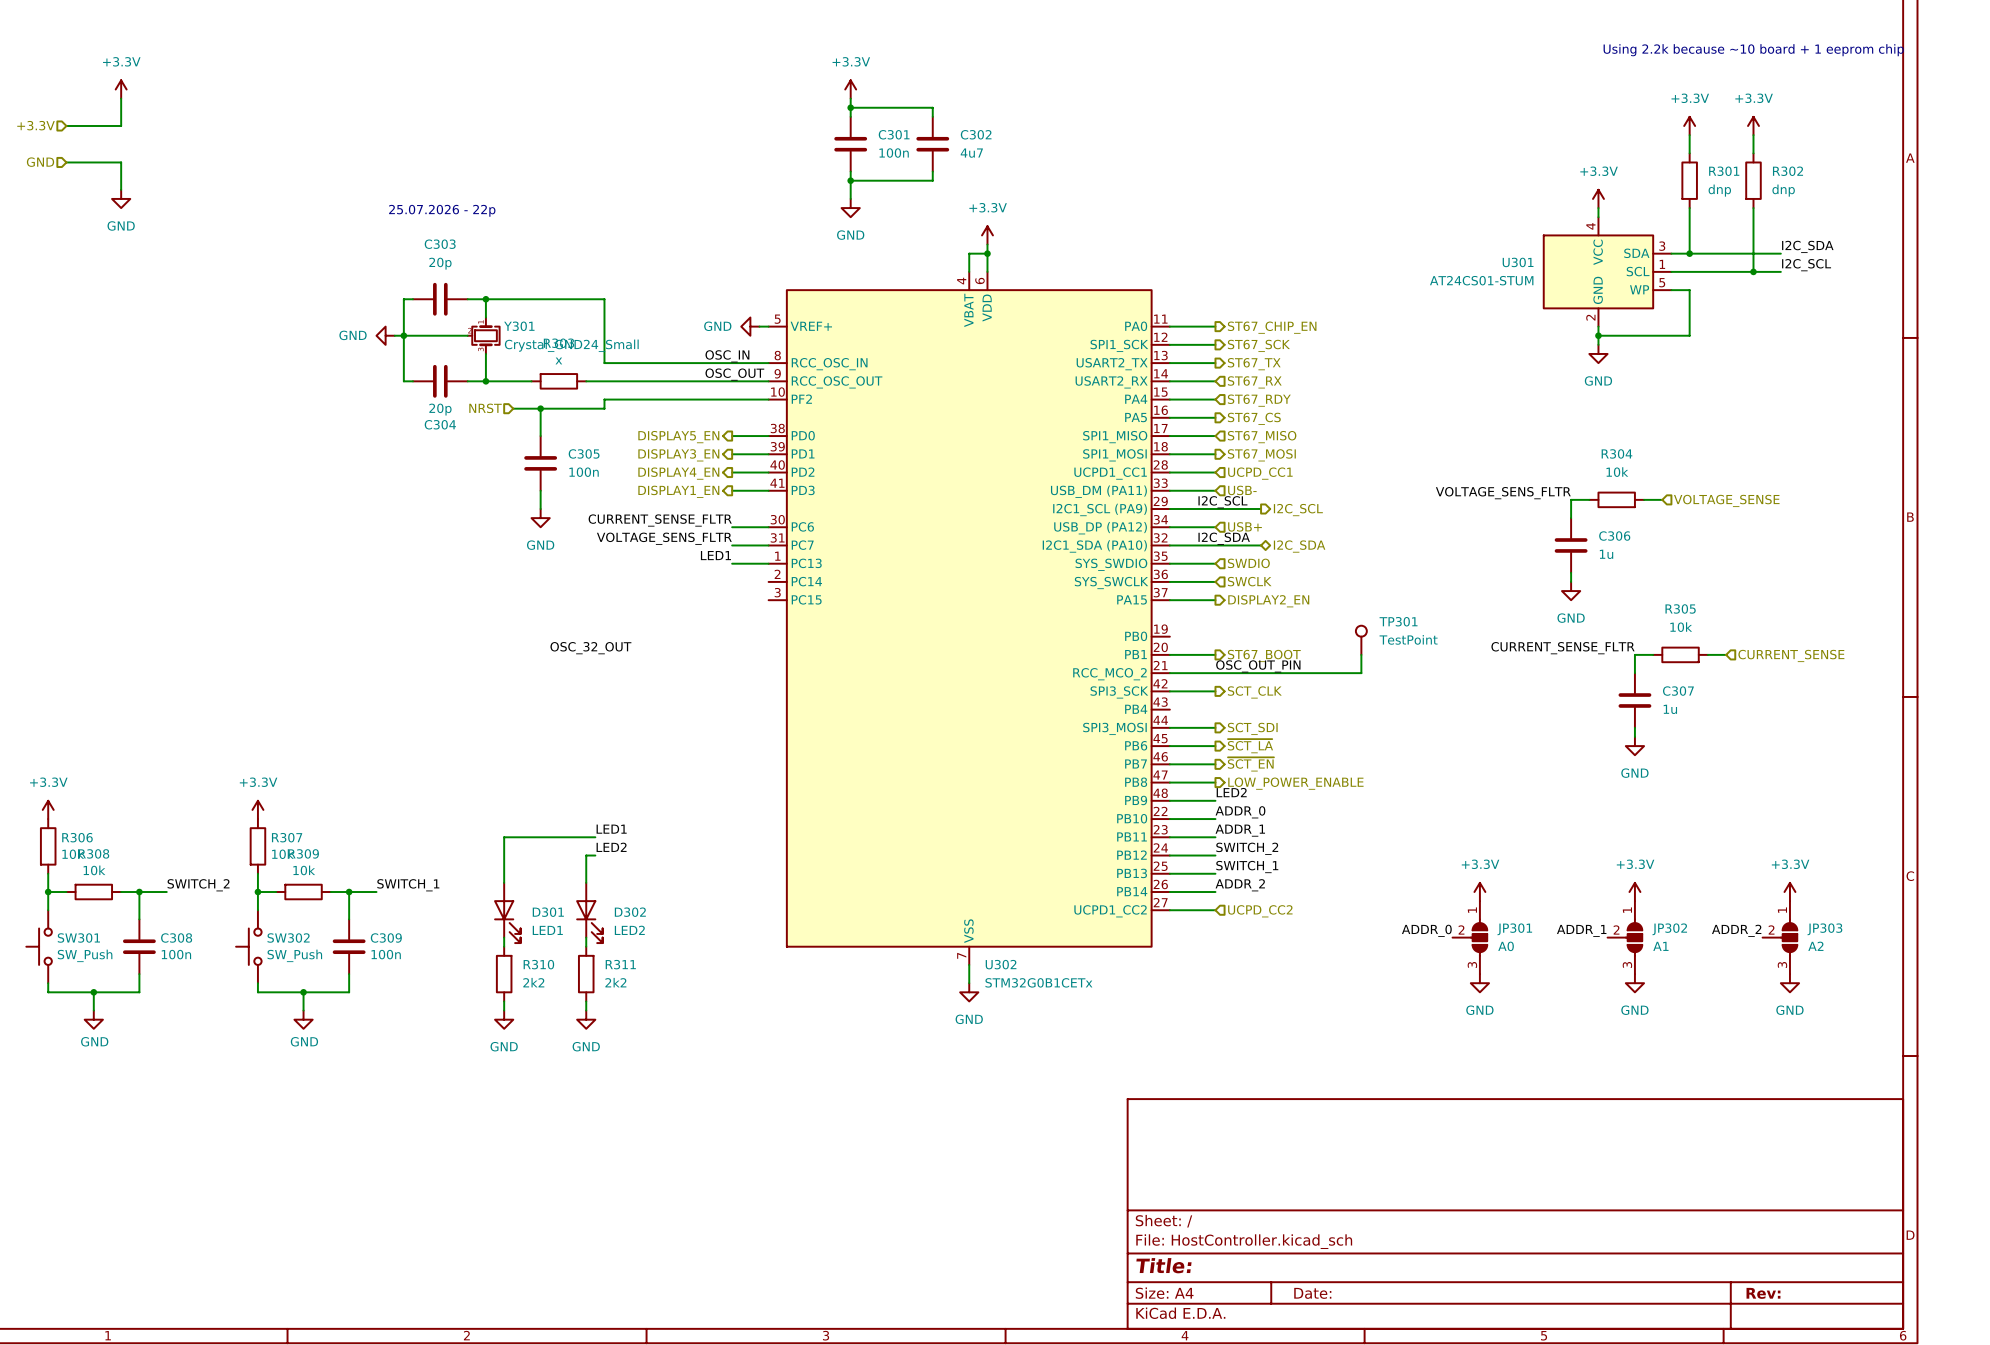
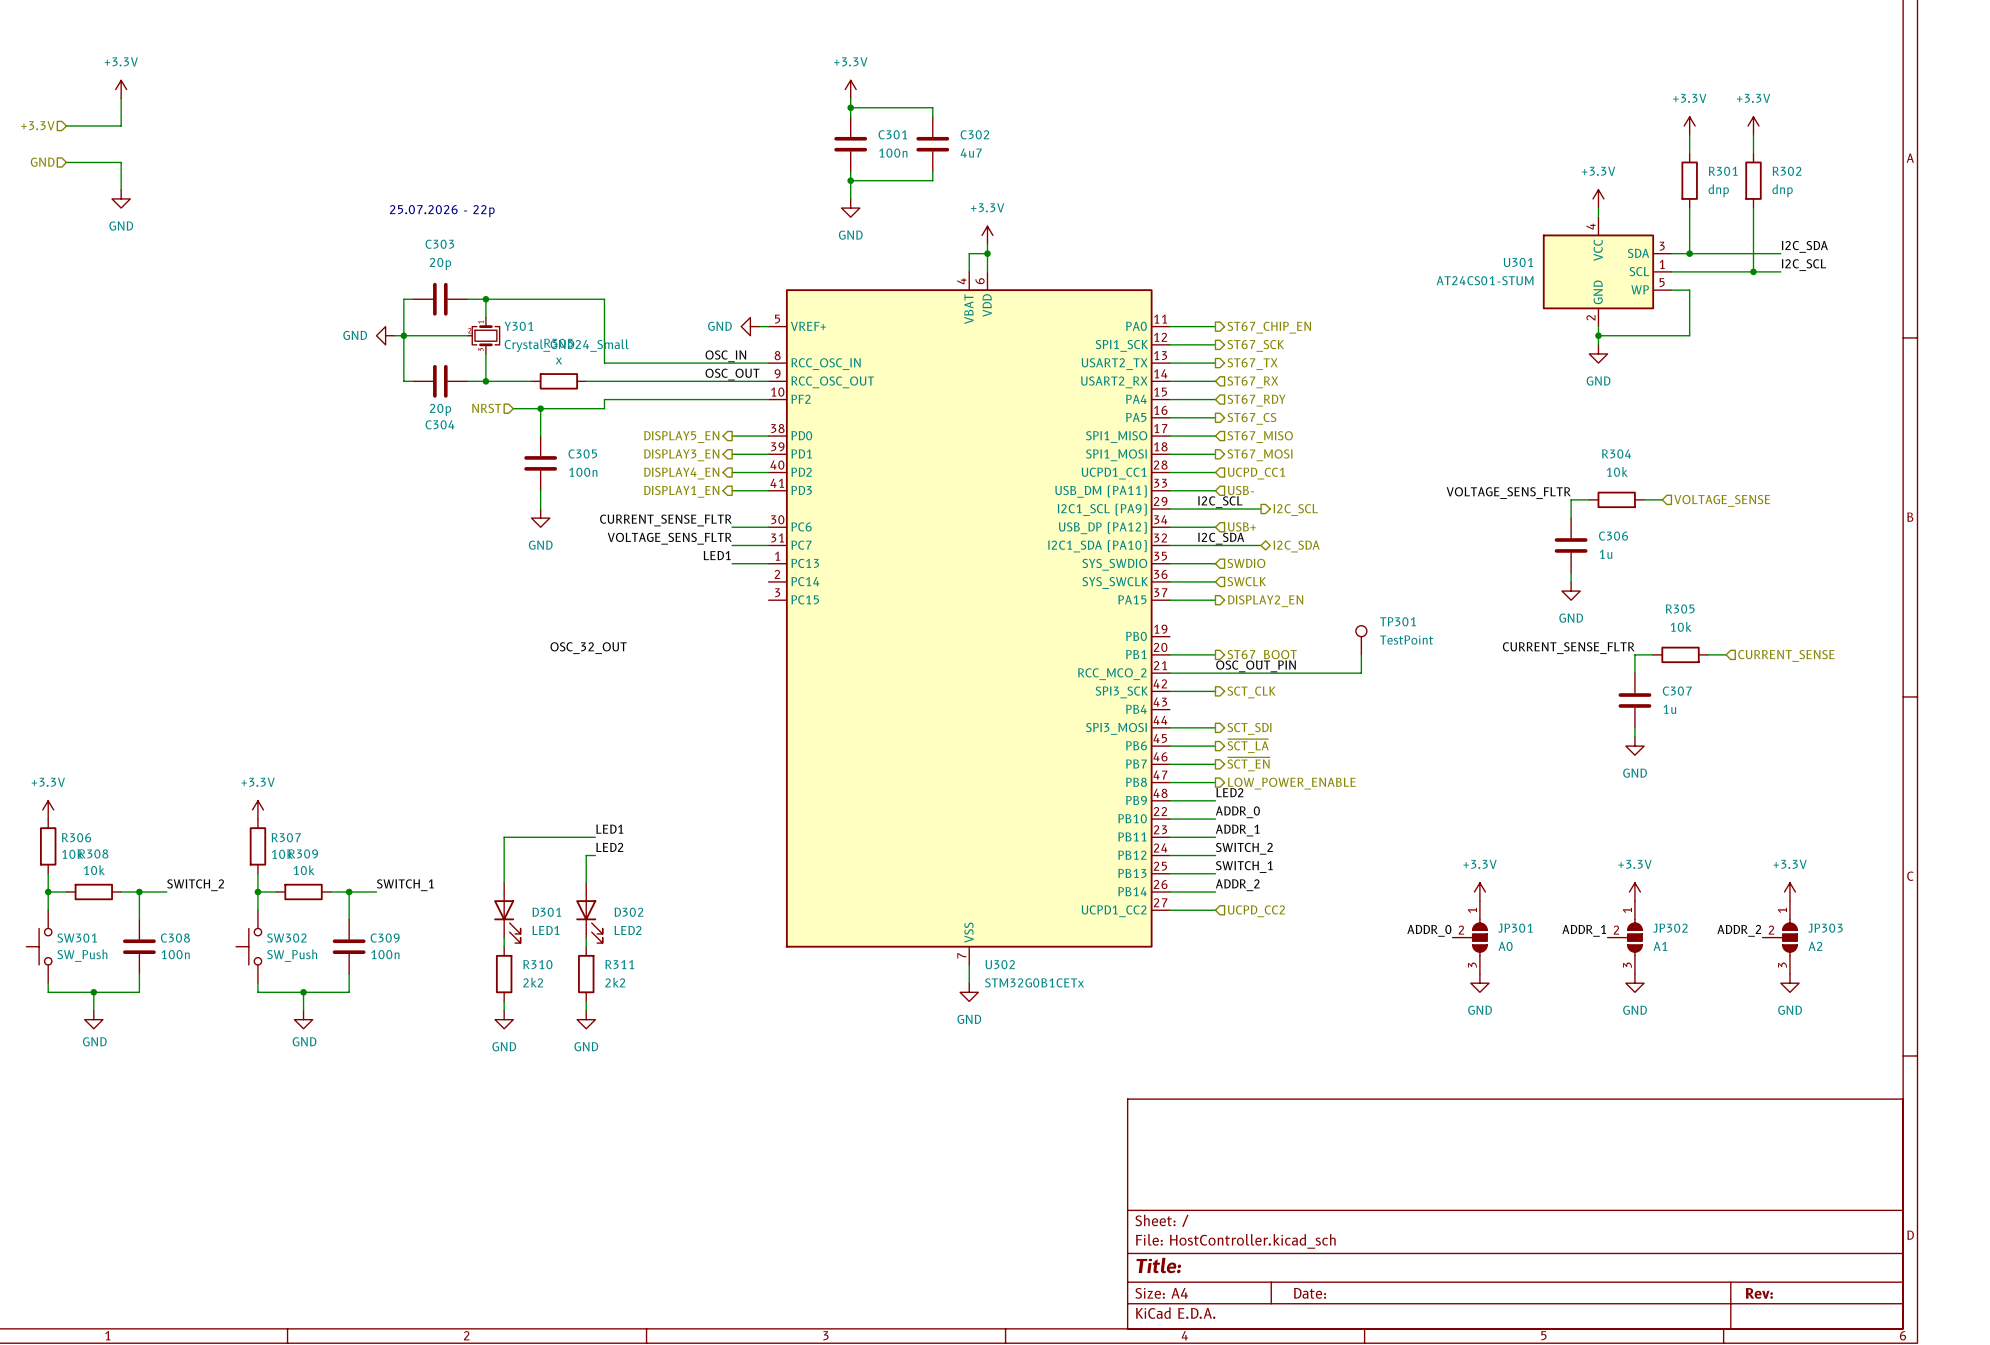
text: Using 2.2k because ~10 board + 1 eeprom chip (1753, 50) -> none

